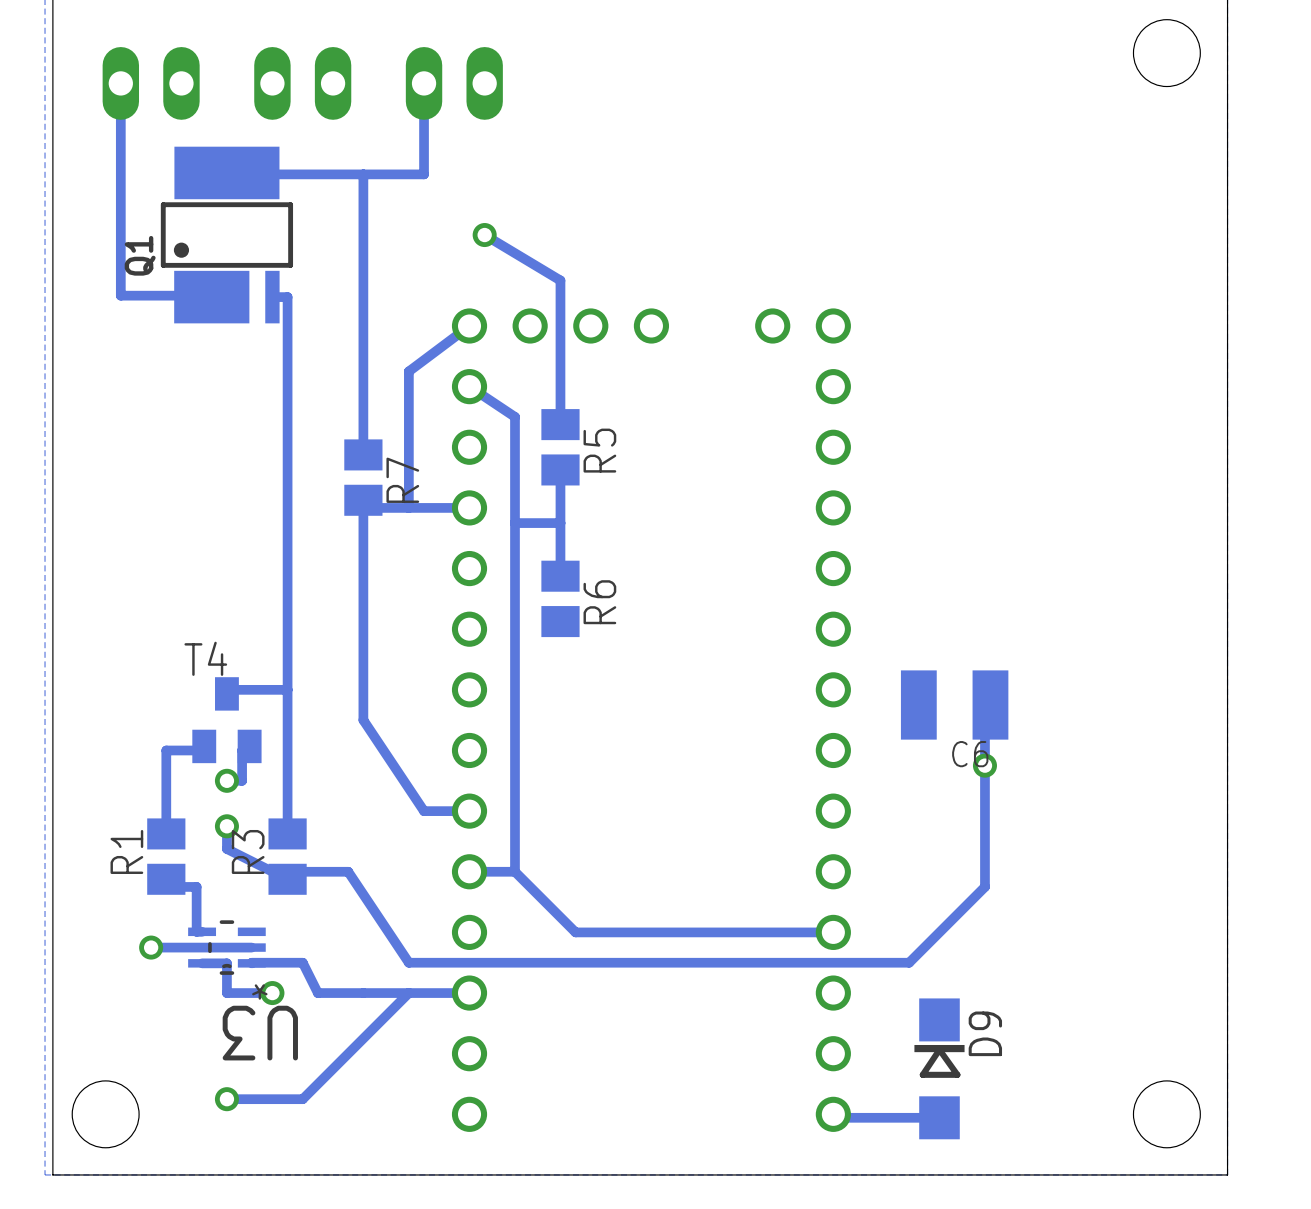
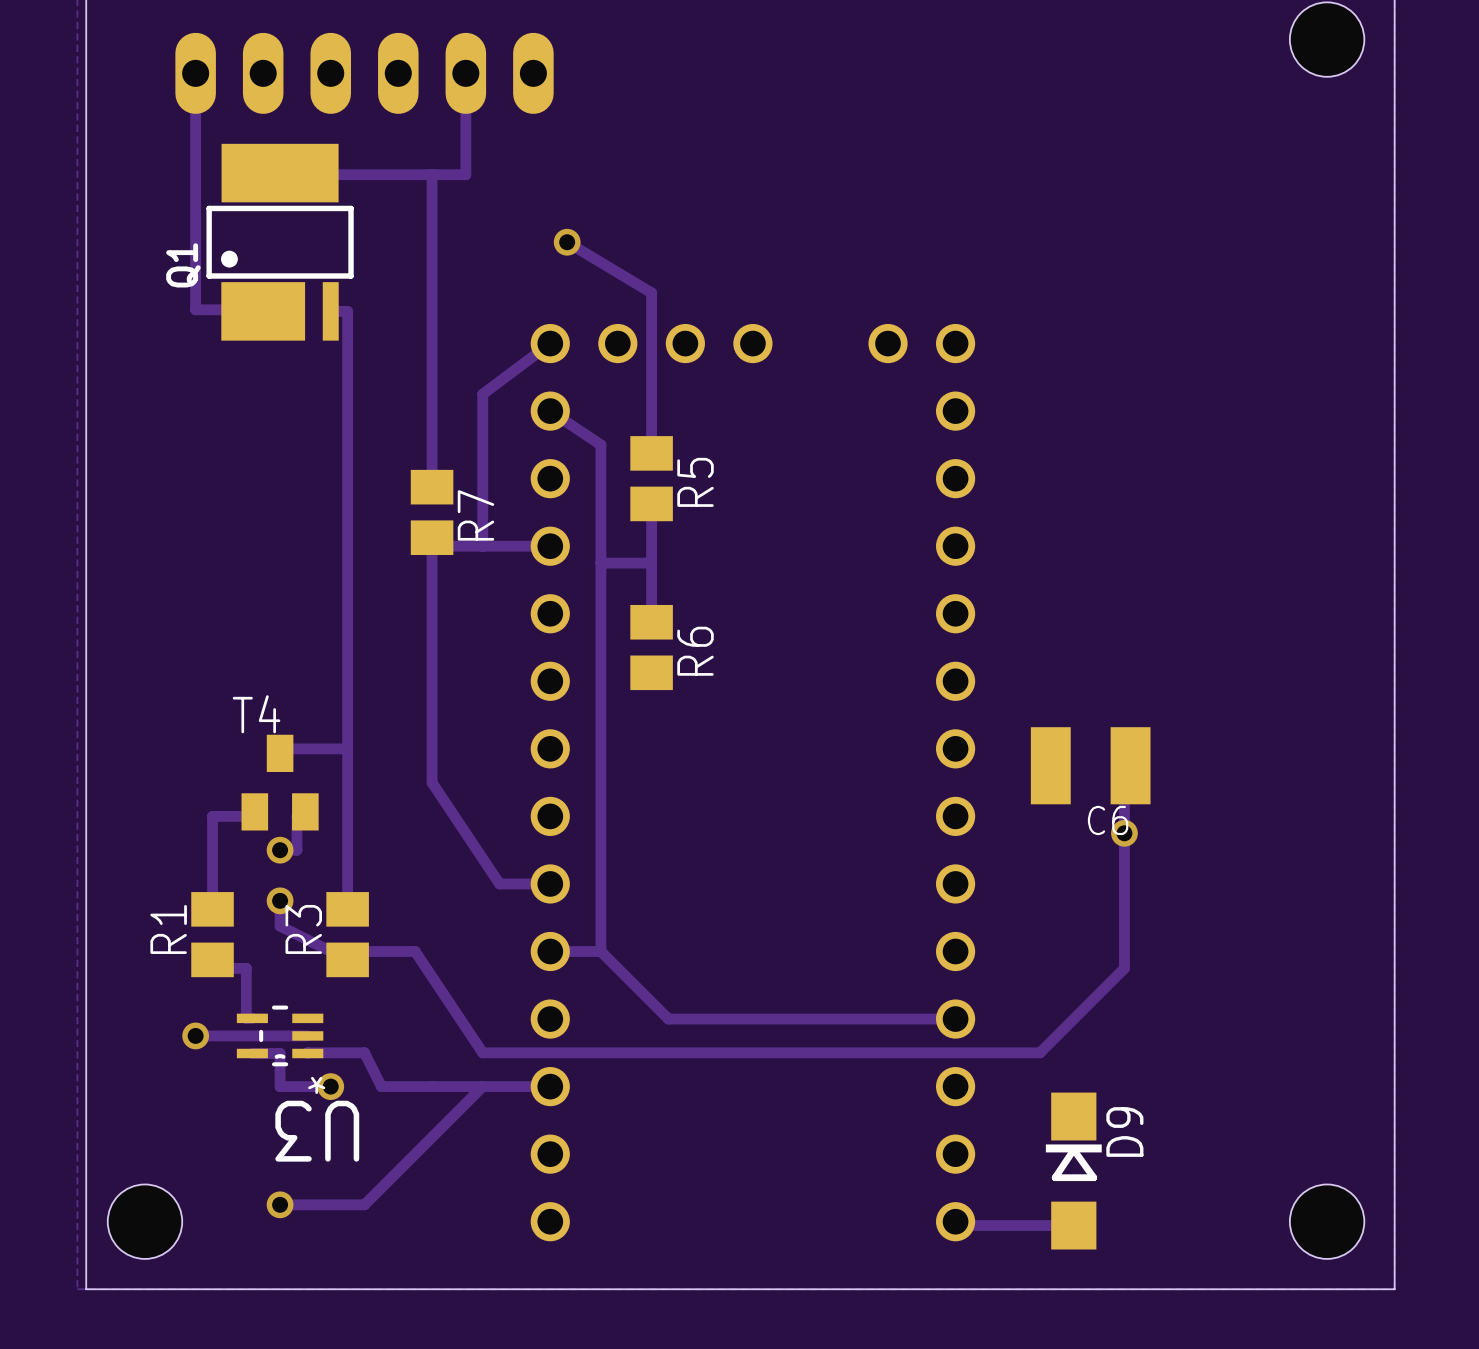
track: (120, 83) (120, 295) (151, 295) -> (195, 73) (195, 309)
part position: (151, 83) -> (229, 73)
track: (424, 83) (424, 174) (393, 174) -> (465, 73) (465, 174)
part position: (454, 83) -> (499, 73)

